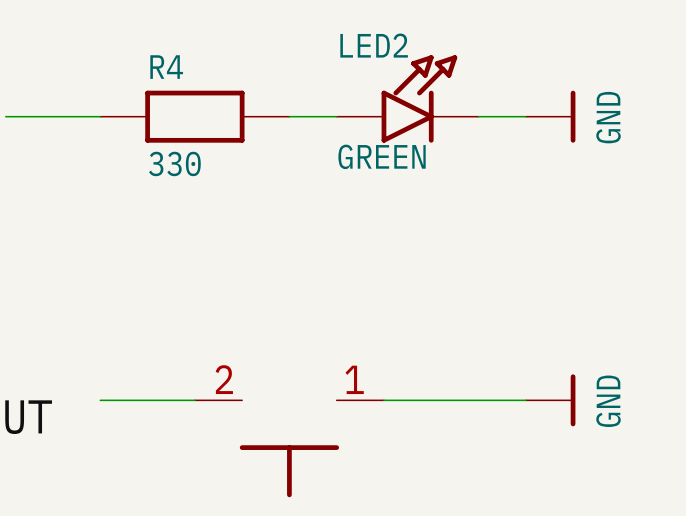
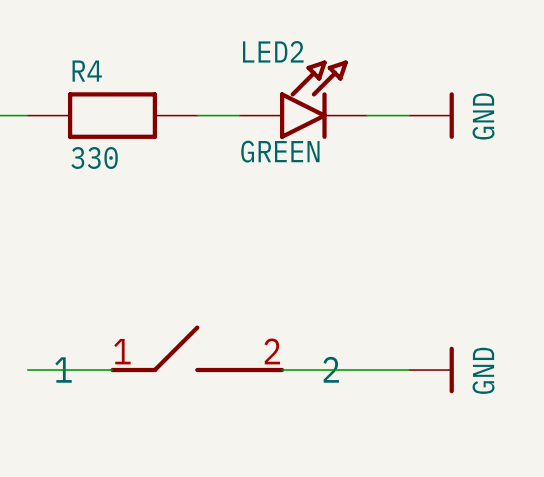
part: none -> (197, 348)
part: (289, 448) -> none

